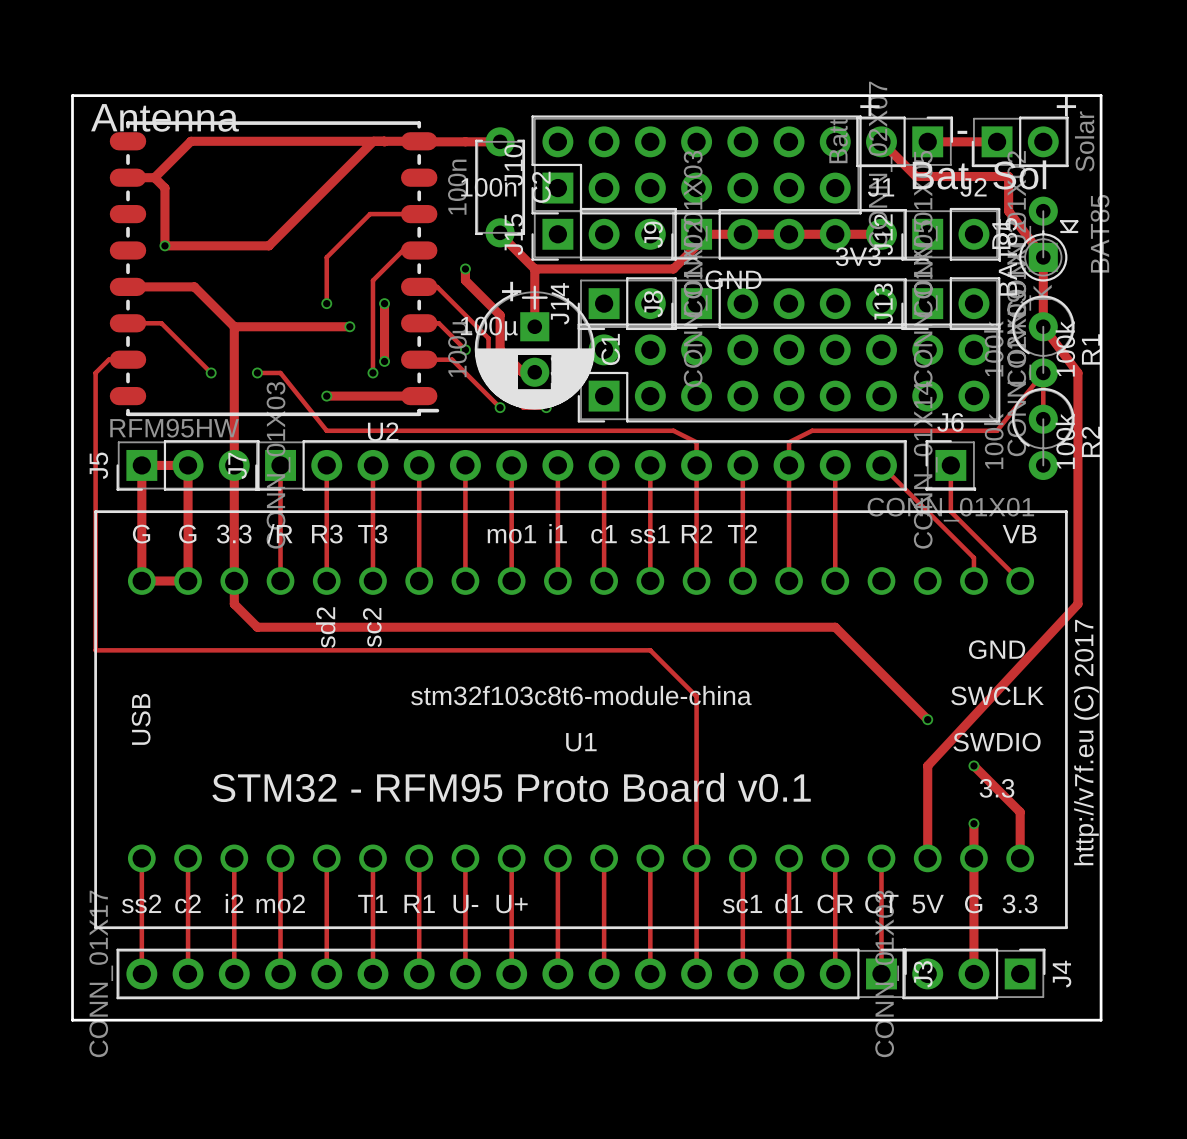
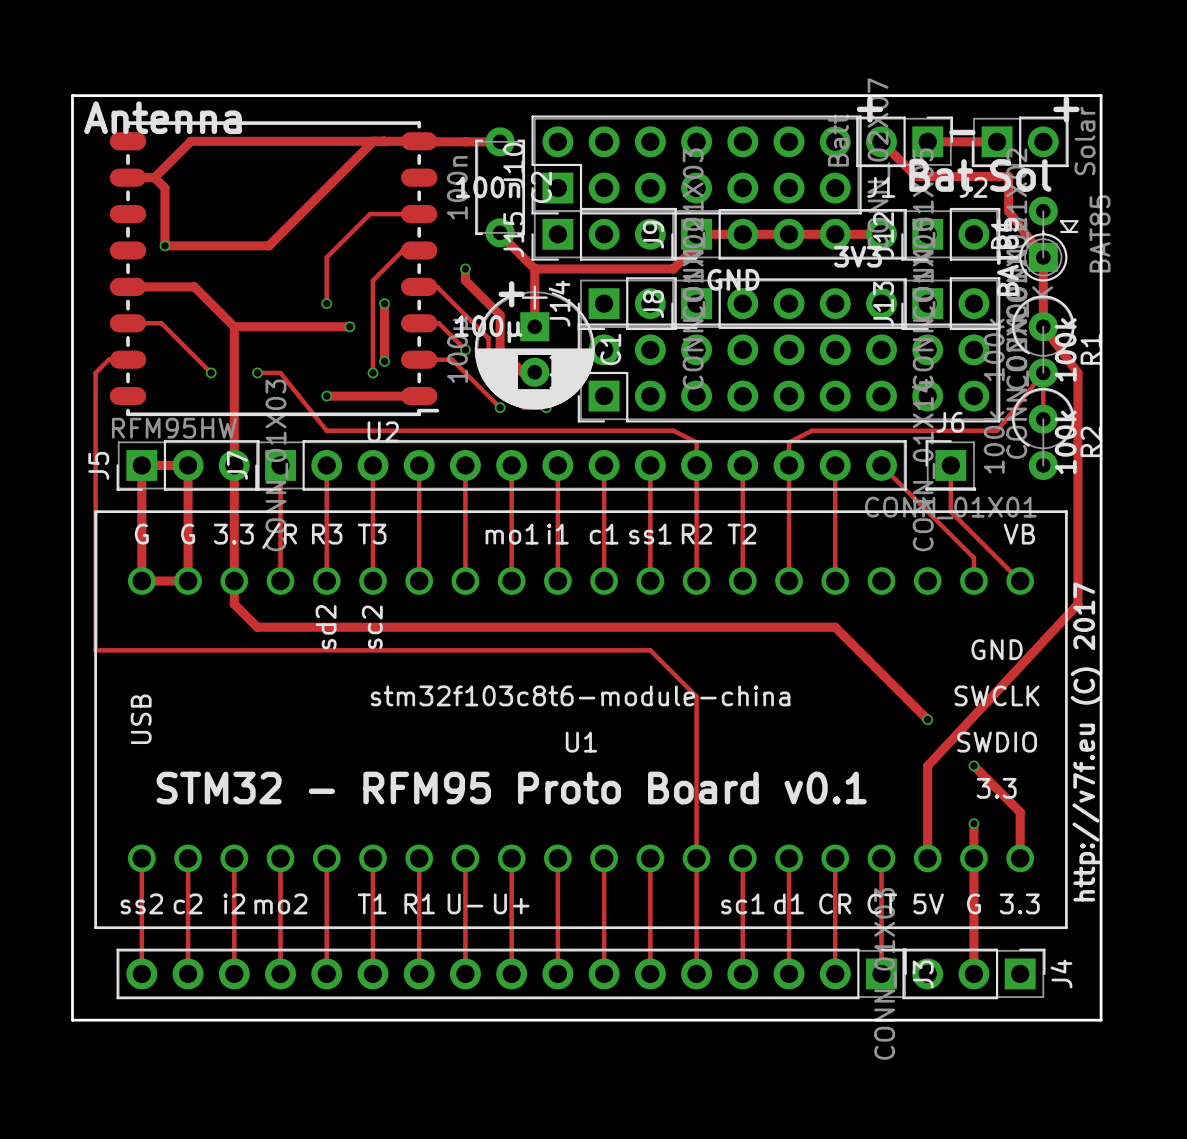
J3 value: CONN_01X17 (101, 973) -> none

